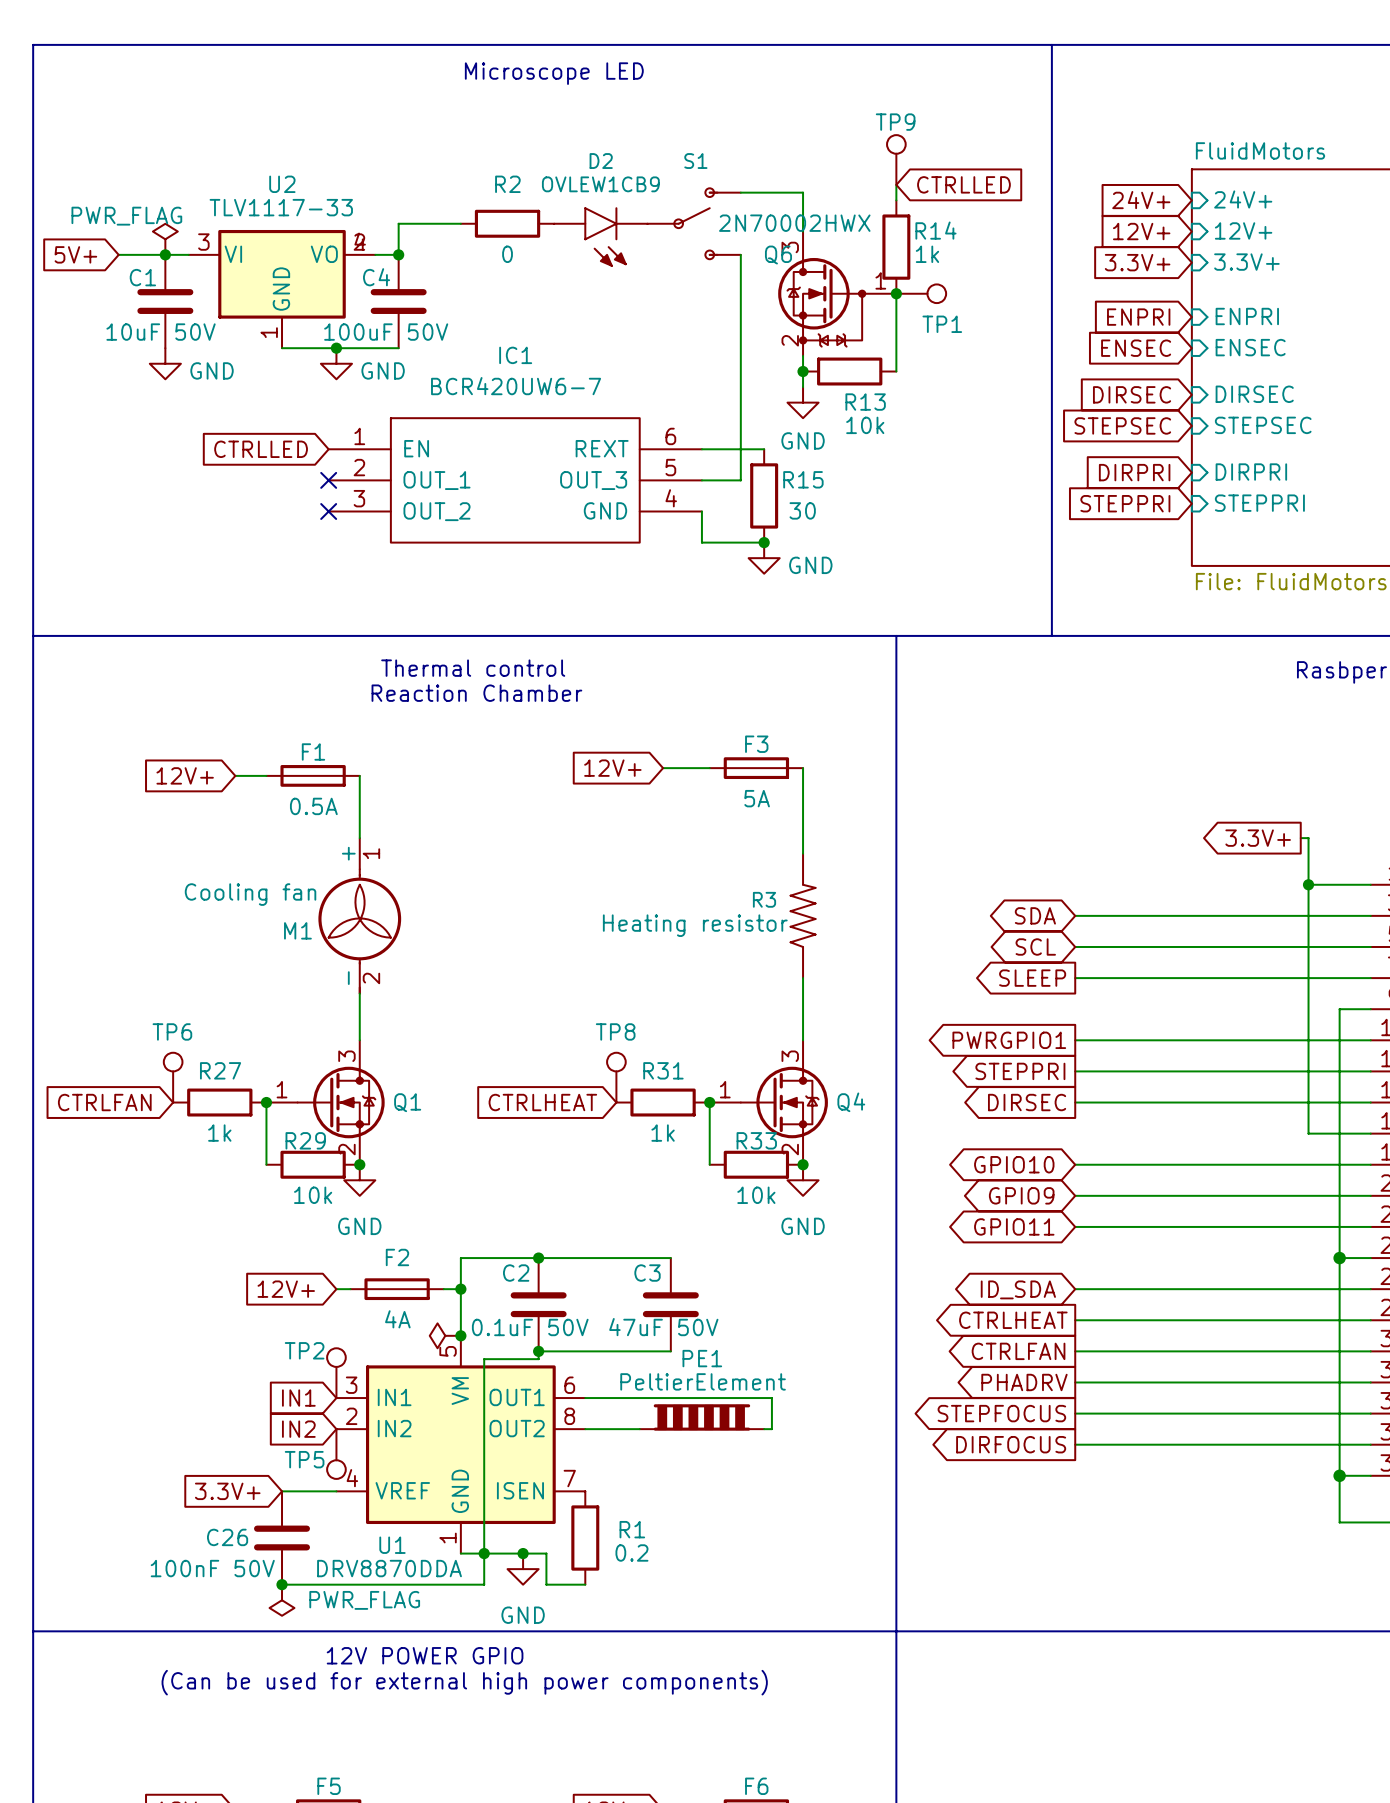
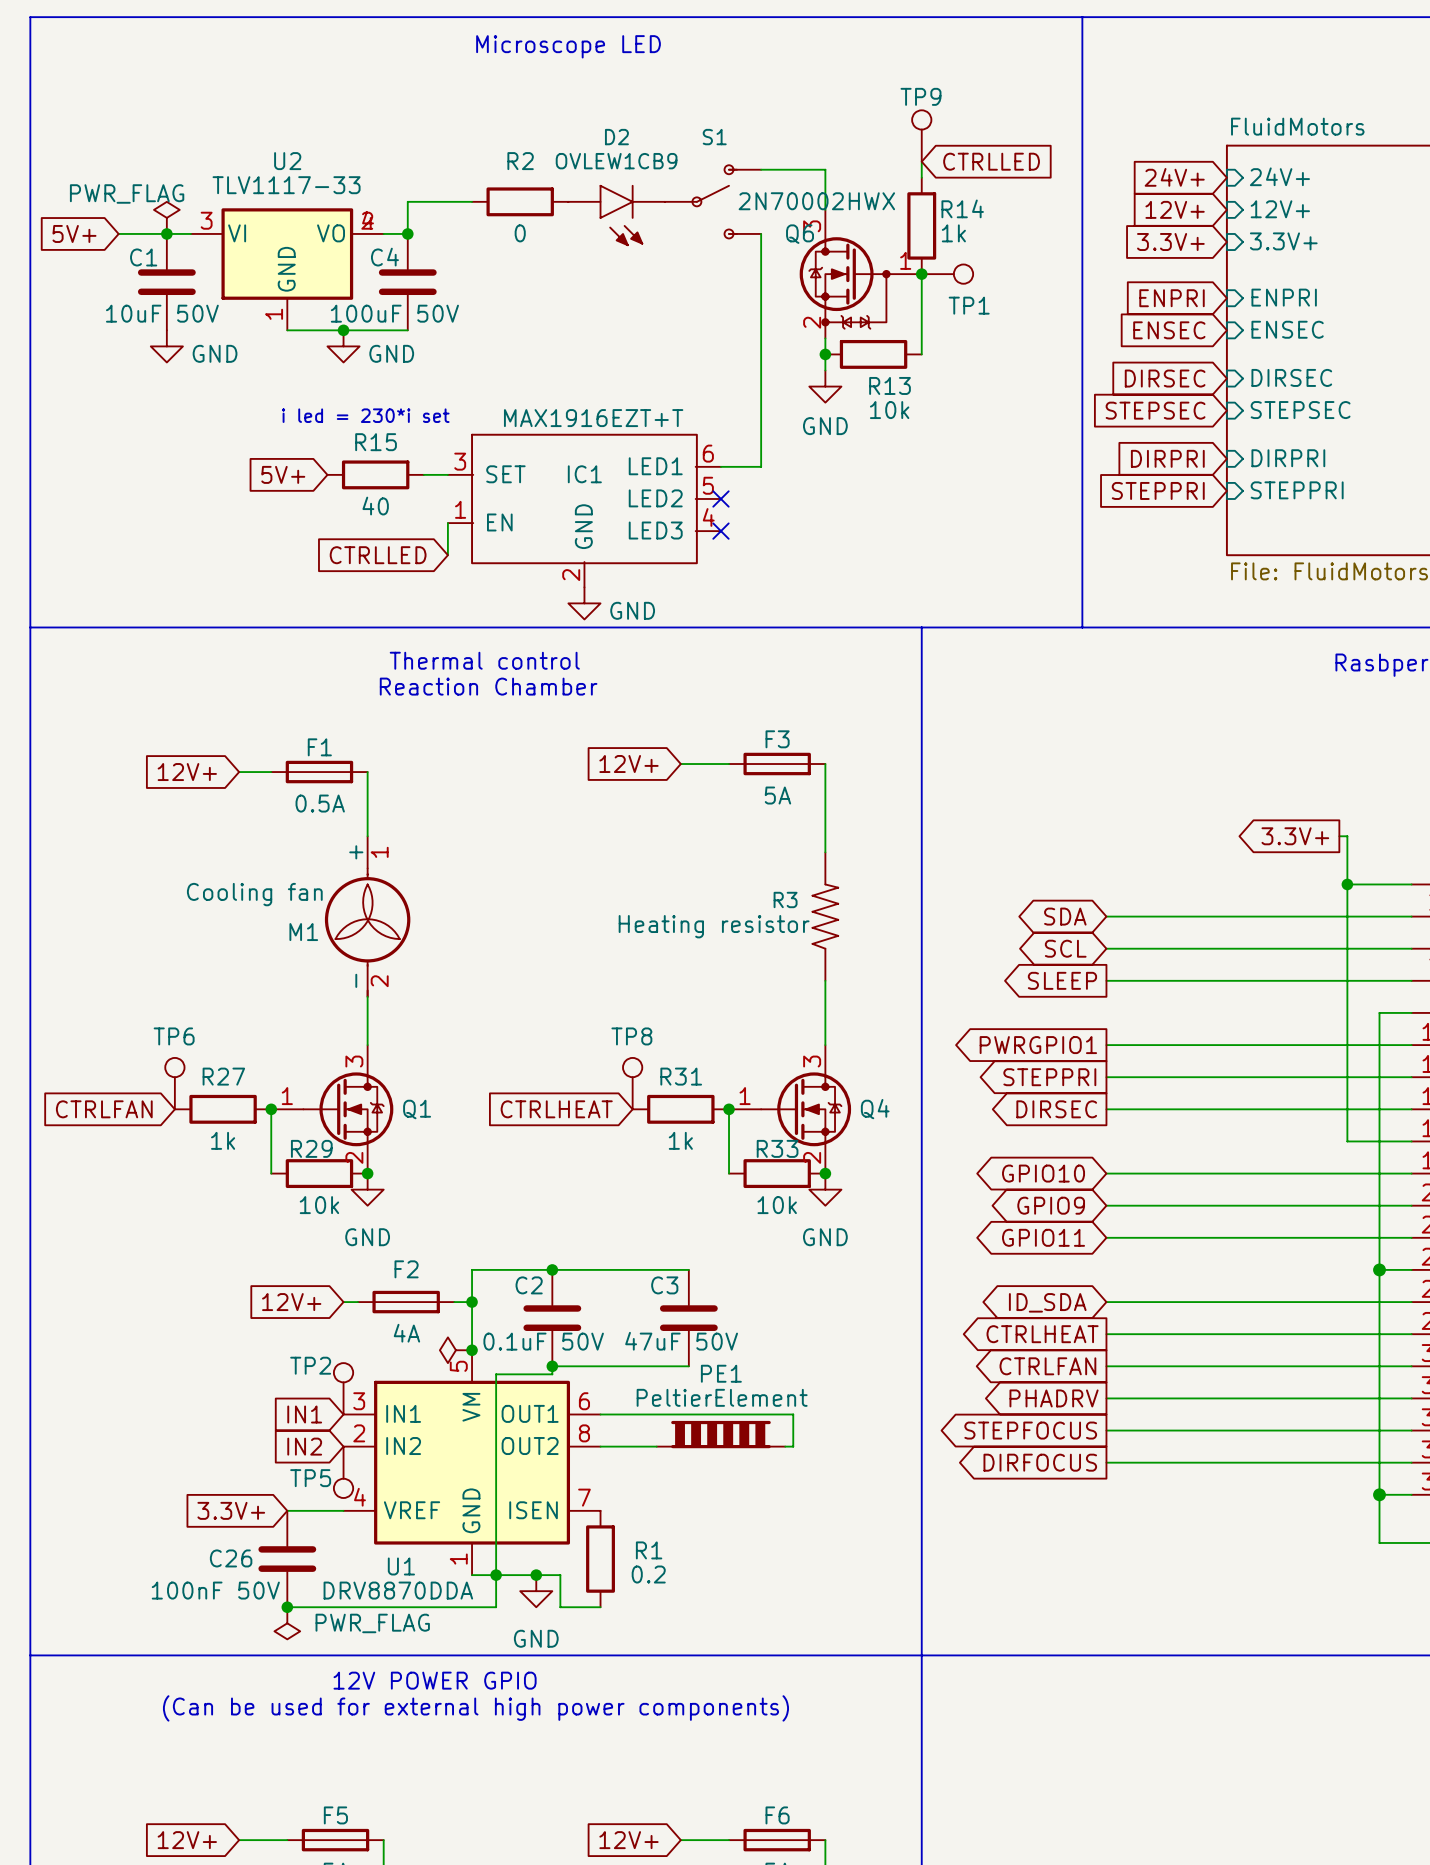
IC1 name position: IC1 (515, 355) -> IC1 (584, 474)
IC1 value: BCR420UW6-7 (516, 386) -> MAX1916EZT+T (593, 418)
IC1 symbol: [328, 417, 702, 544] -> [447, 433, 721, 588]
text: none -> i led = 230*i set (365, 415)
global label position: CTRLLED (261, 449) -> CTRLLED (378, 555)
wire: (701, 449) (764, 449) -> none
R15 name position: R15 (803, 479) -> R15 (376, 442)
no-connect mark: (328, 480) -> none
global label: none -> 5V+ (283, 474)
wire: none -> (423, 474) (447, 474)
R15 rotation: 0° (764, 495) -> 90° clockwise (375, 474)
R15 position: (764, 495) -> (375, 474)
R15 value: 30 (802, 510) -> 40 (375, 506)
no-connect mark: (328, 511) -> none
wire: (701, 511) (701, 542) (764, 542) -> none
no-connect mark: none -> (720, 498)
wire: none -> (447, 523) (447, 555)
no-connect mark: none -> (720, 531)
junction: (764, 542) -> none
power symbol position: GND (764, 558) -> GND (584, 603)

